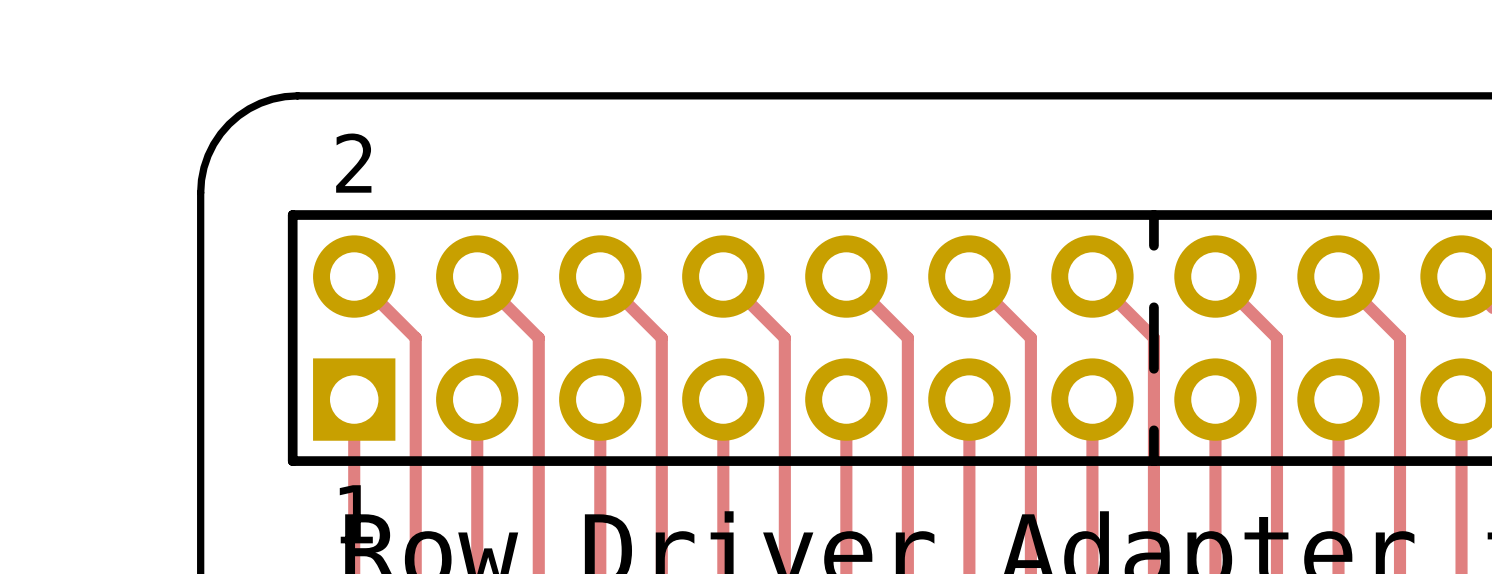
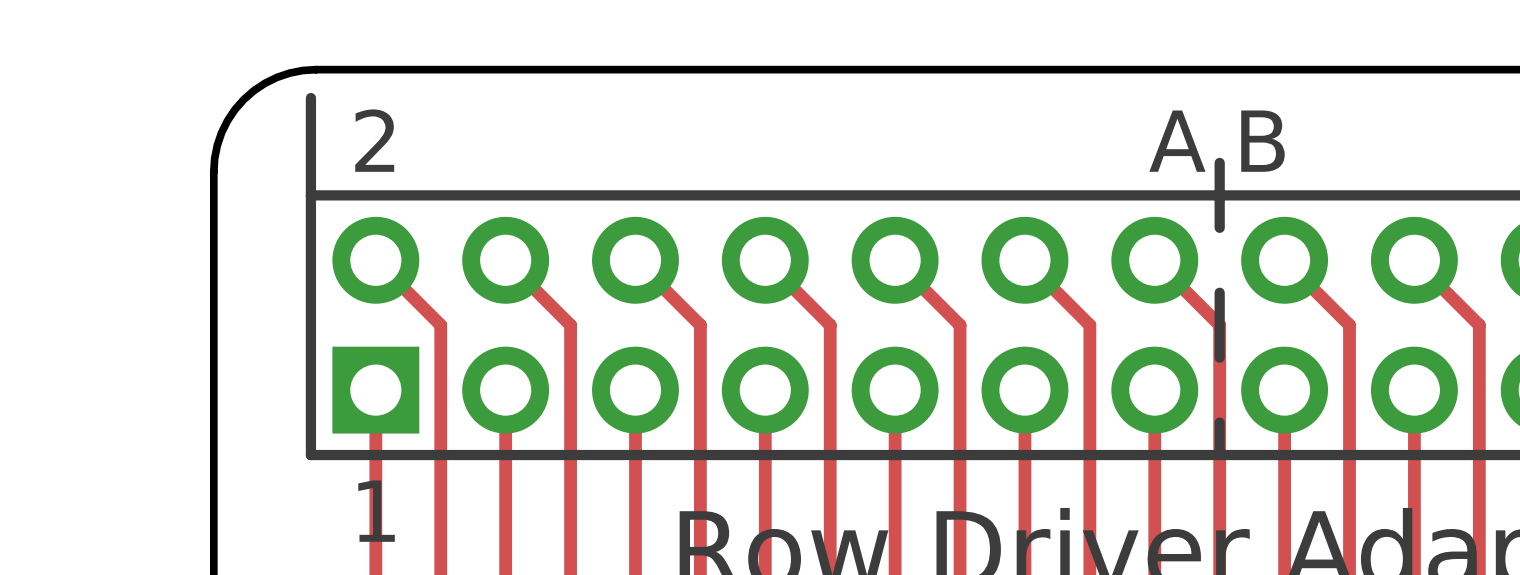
line: none -> (310, 98) (310, 195)
text: none -> A B (1217, 141)
line: none -> (1219, 162) (1219, 195)

